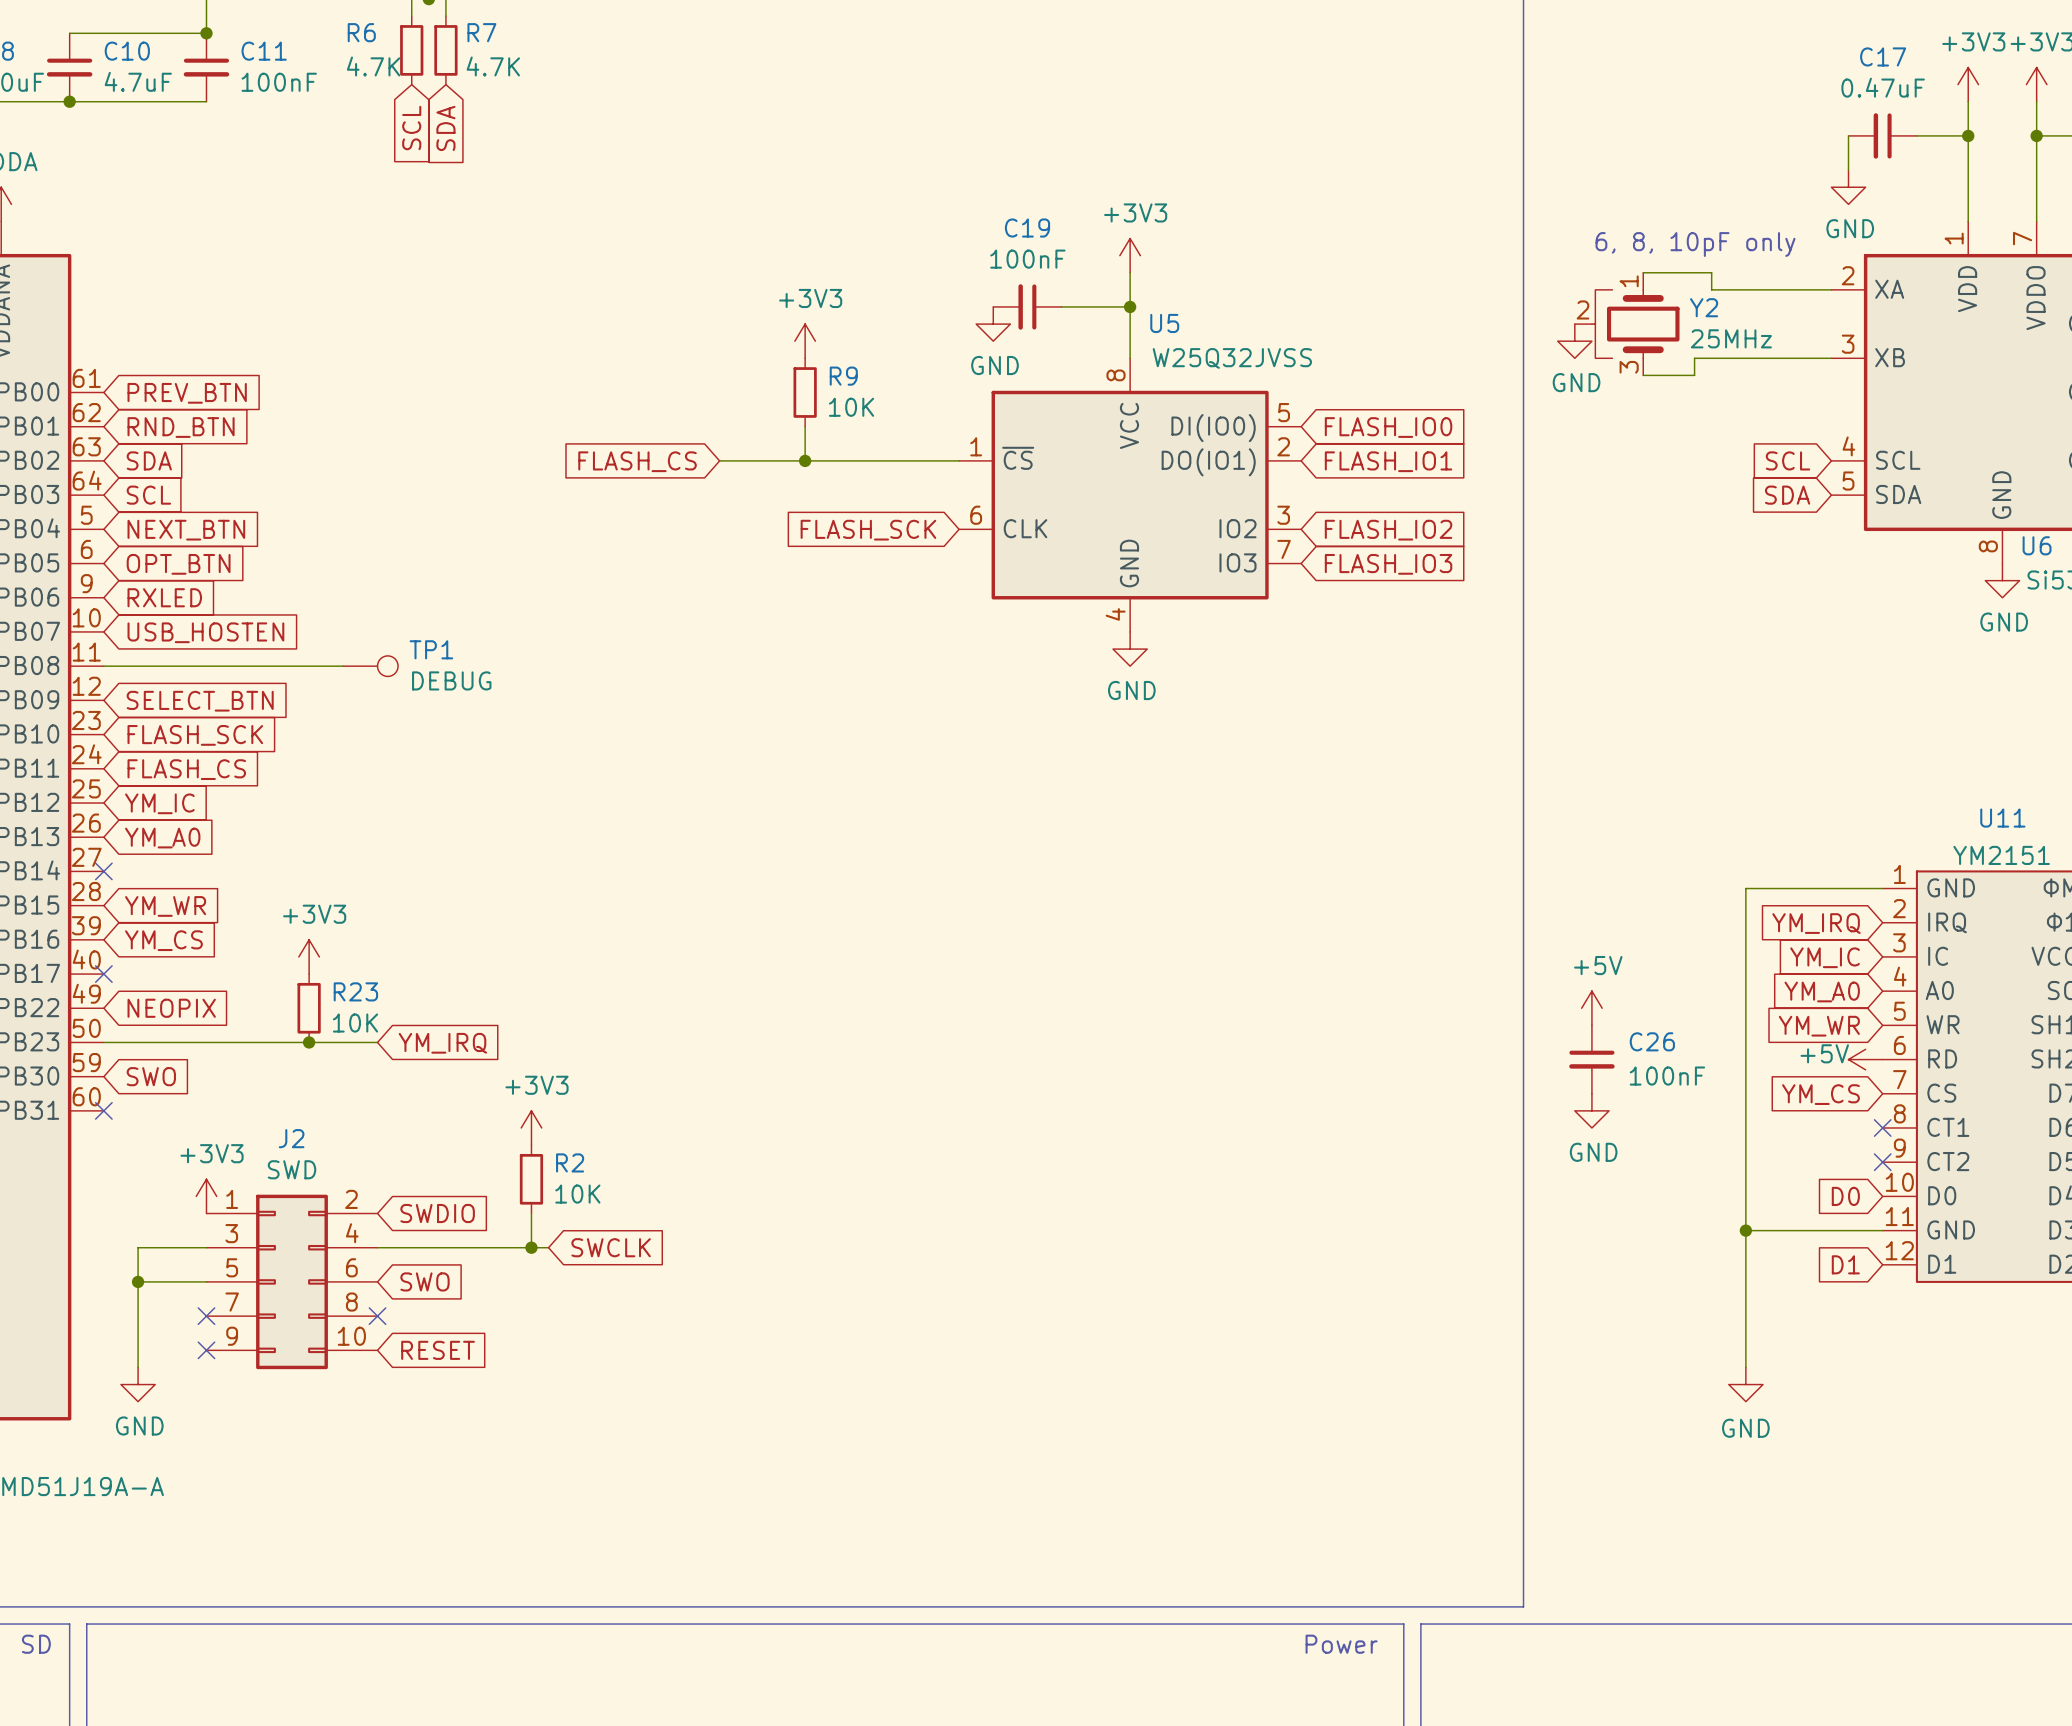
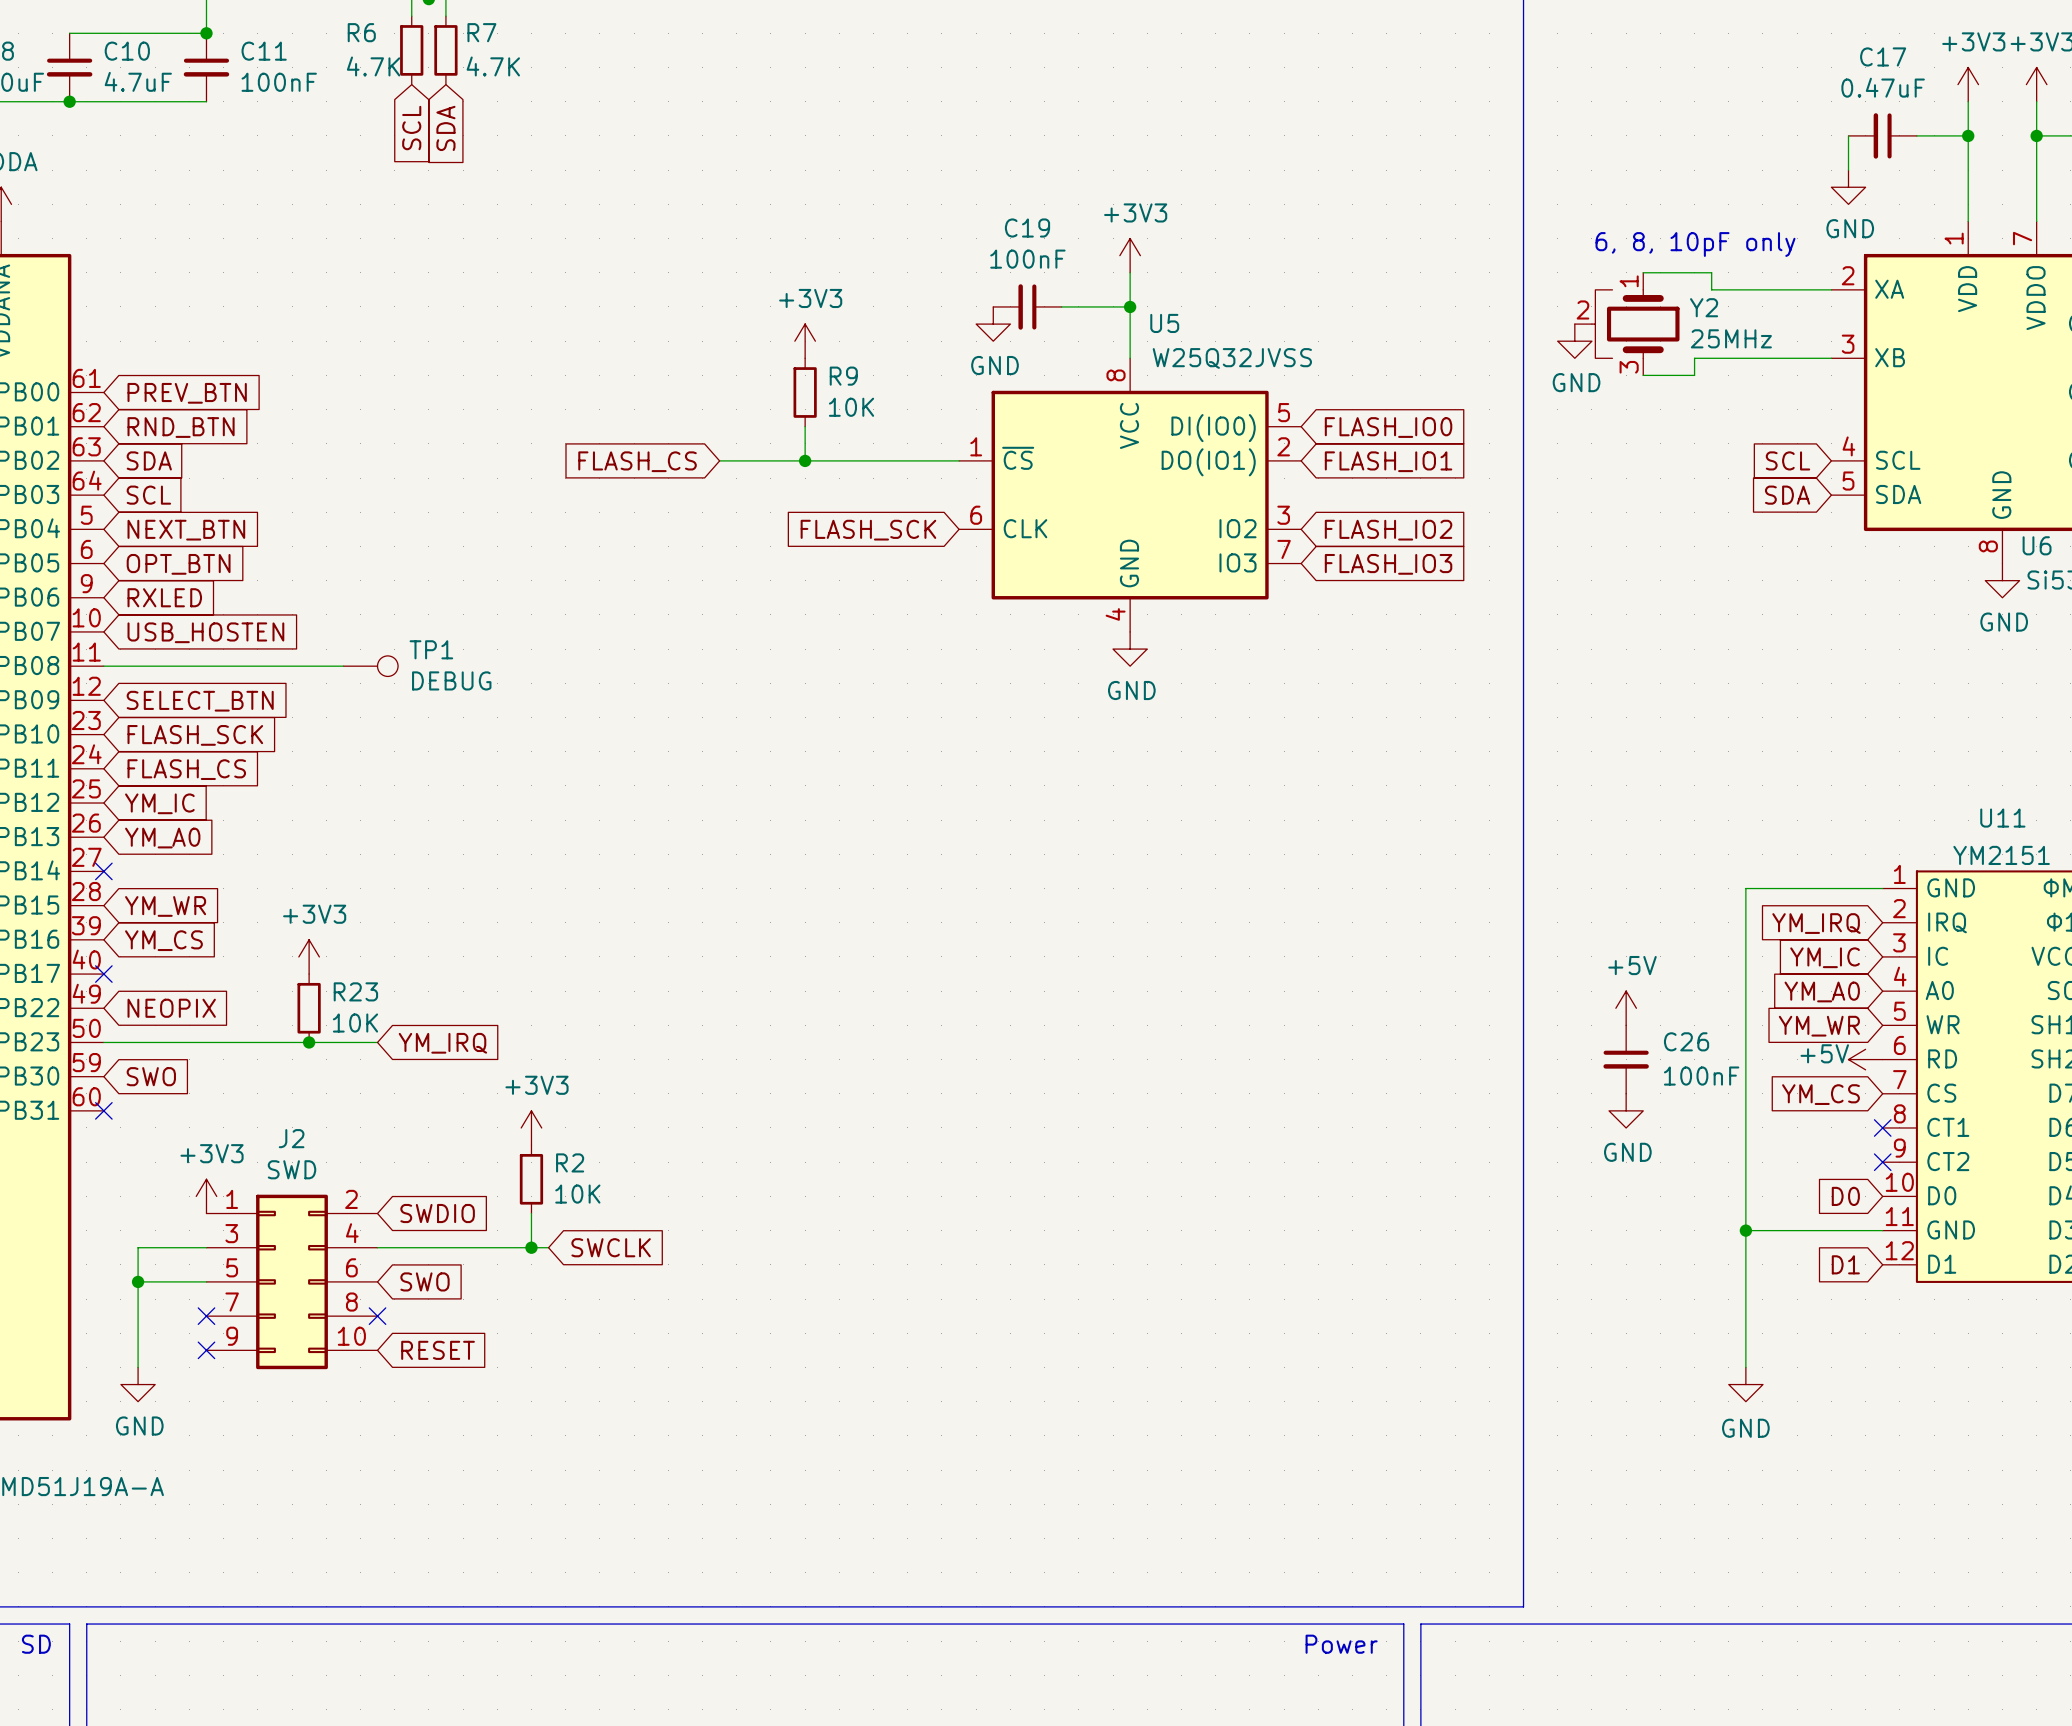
power symbol position: +5V (1591, 1008) -> +5V (1626, 1008)
C26 position: (1591, 1059) -> (1626, 1059)
power symbol position: GND (1591, 1110) -> GND (1626, 1110)

